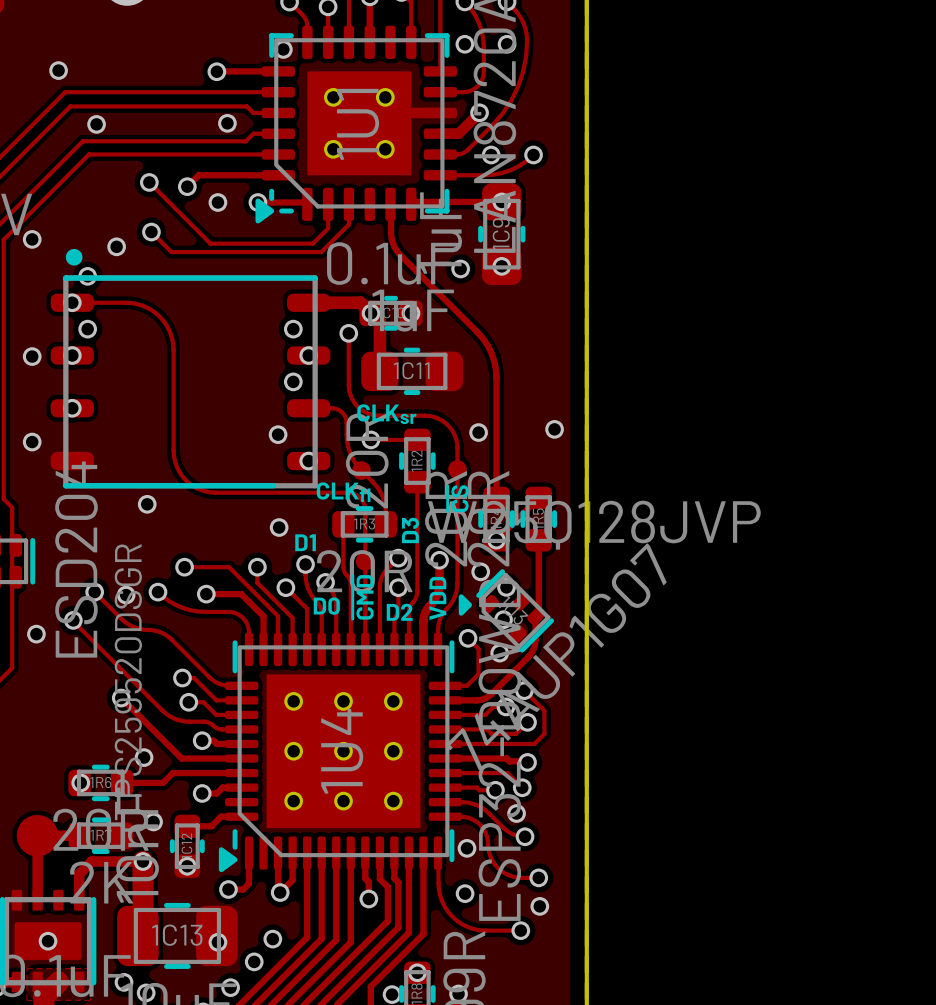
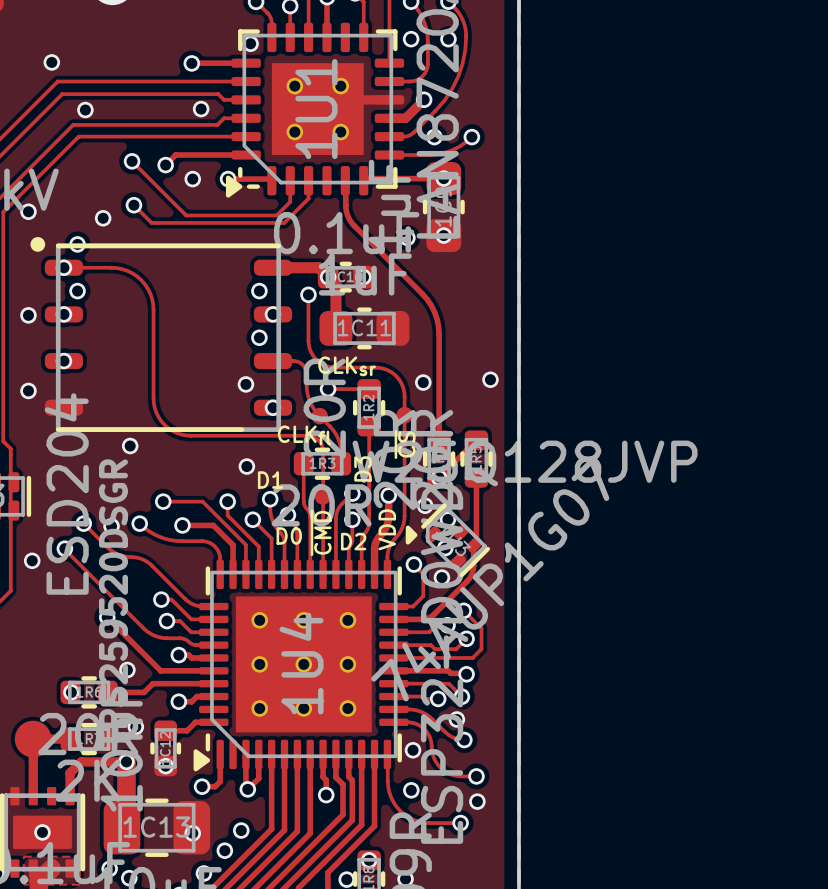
part footprint: [50, 248, 331, 489] -> [30, 237, 293, 432]

